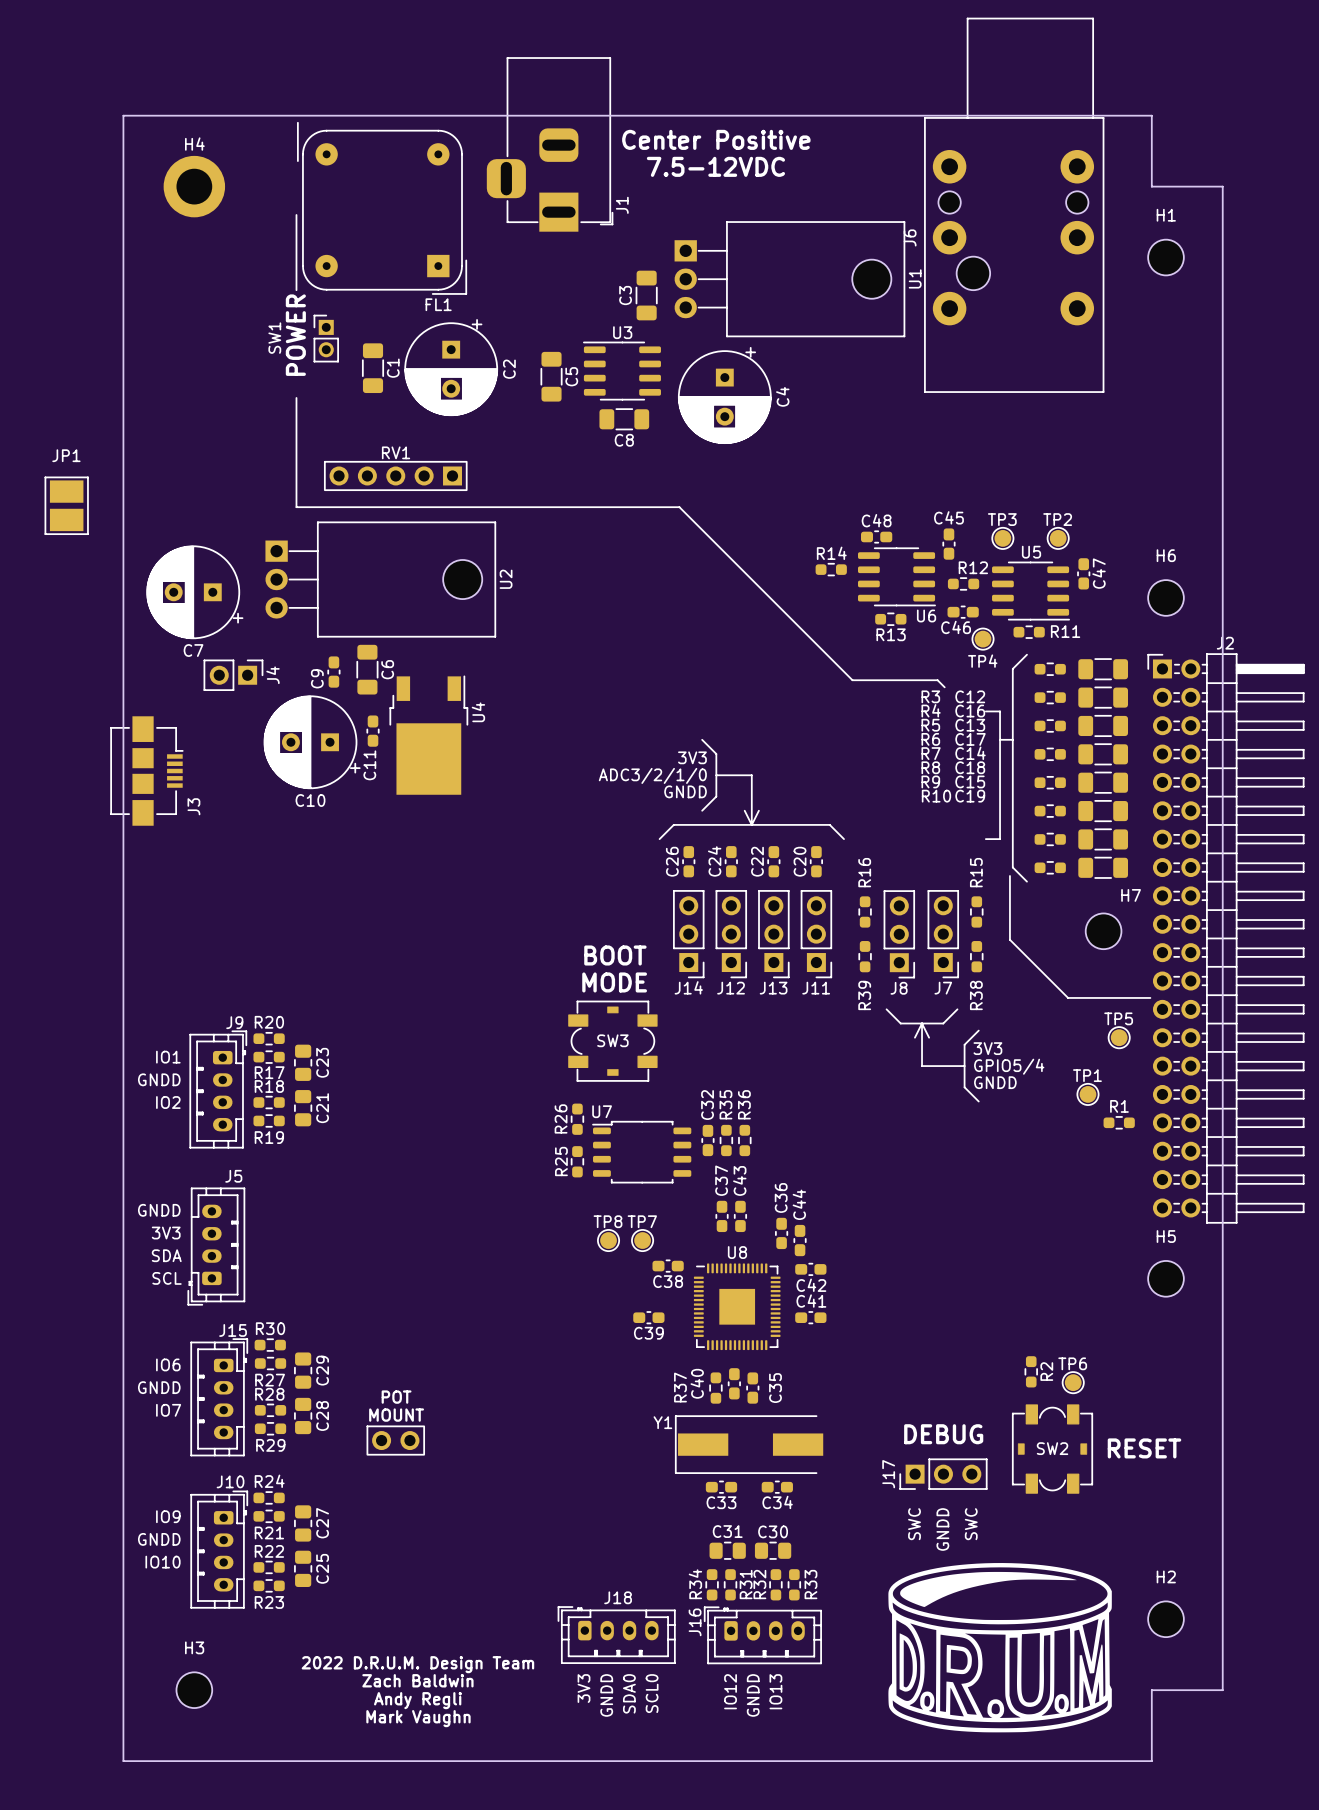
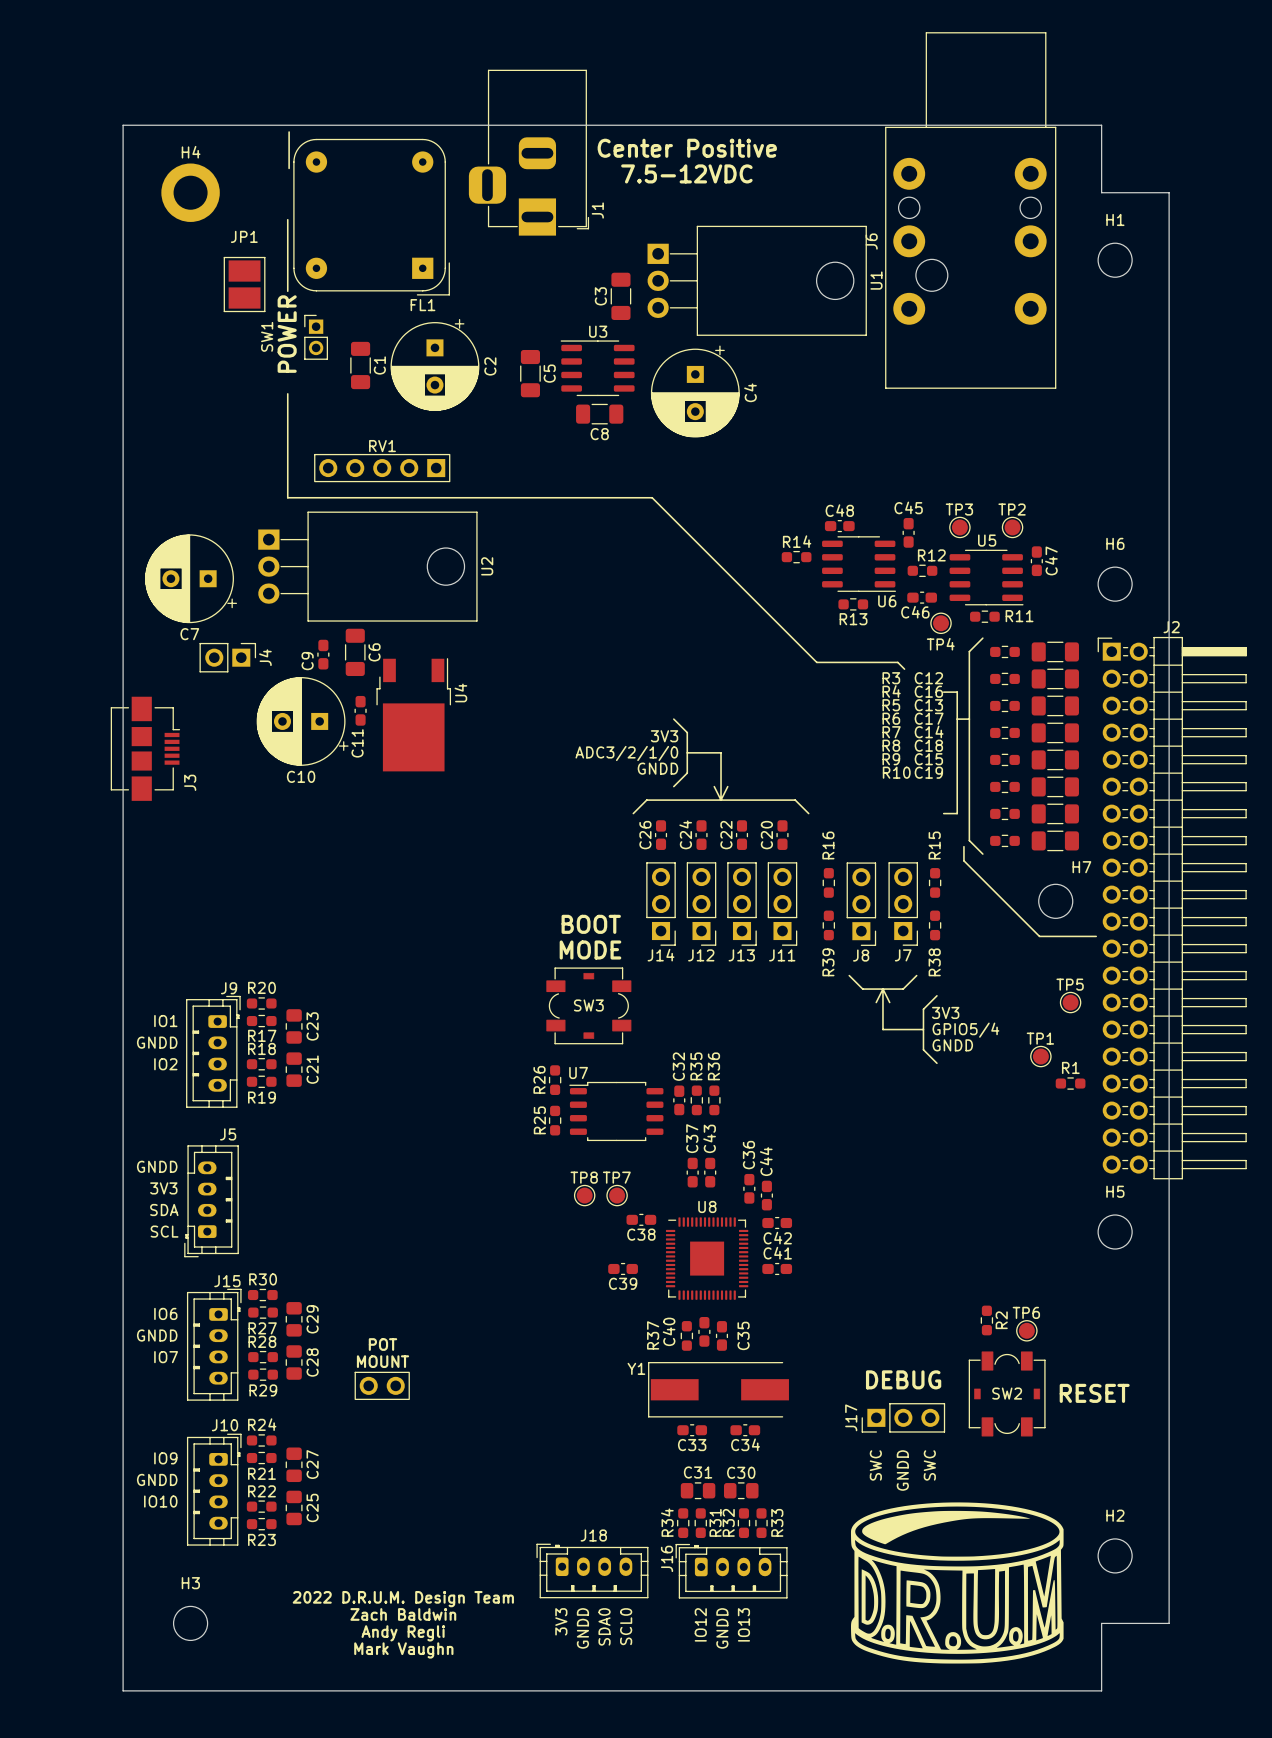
JP1 position: (66, 505) -> (244, 284)
line: none -> (963, 846) (963, 860) (1039, 936) (1096, 936)
line: (1009, 875) (1009, 939) (1068, 997) (1150, 997) -> none

